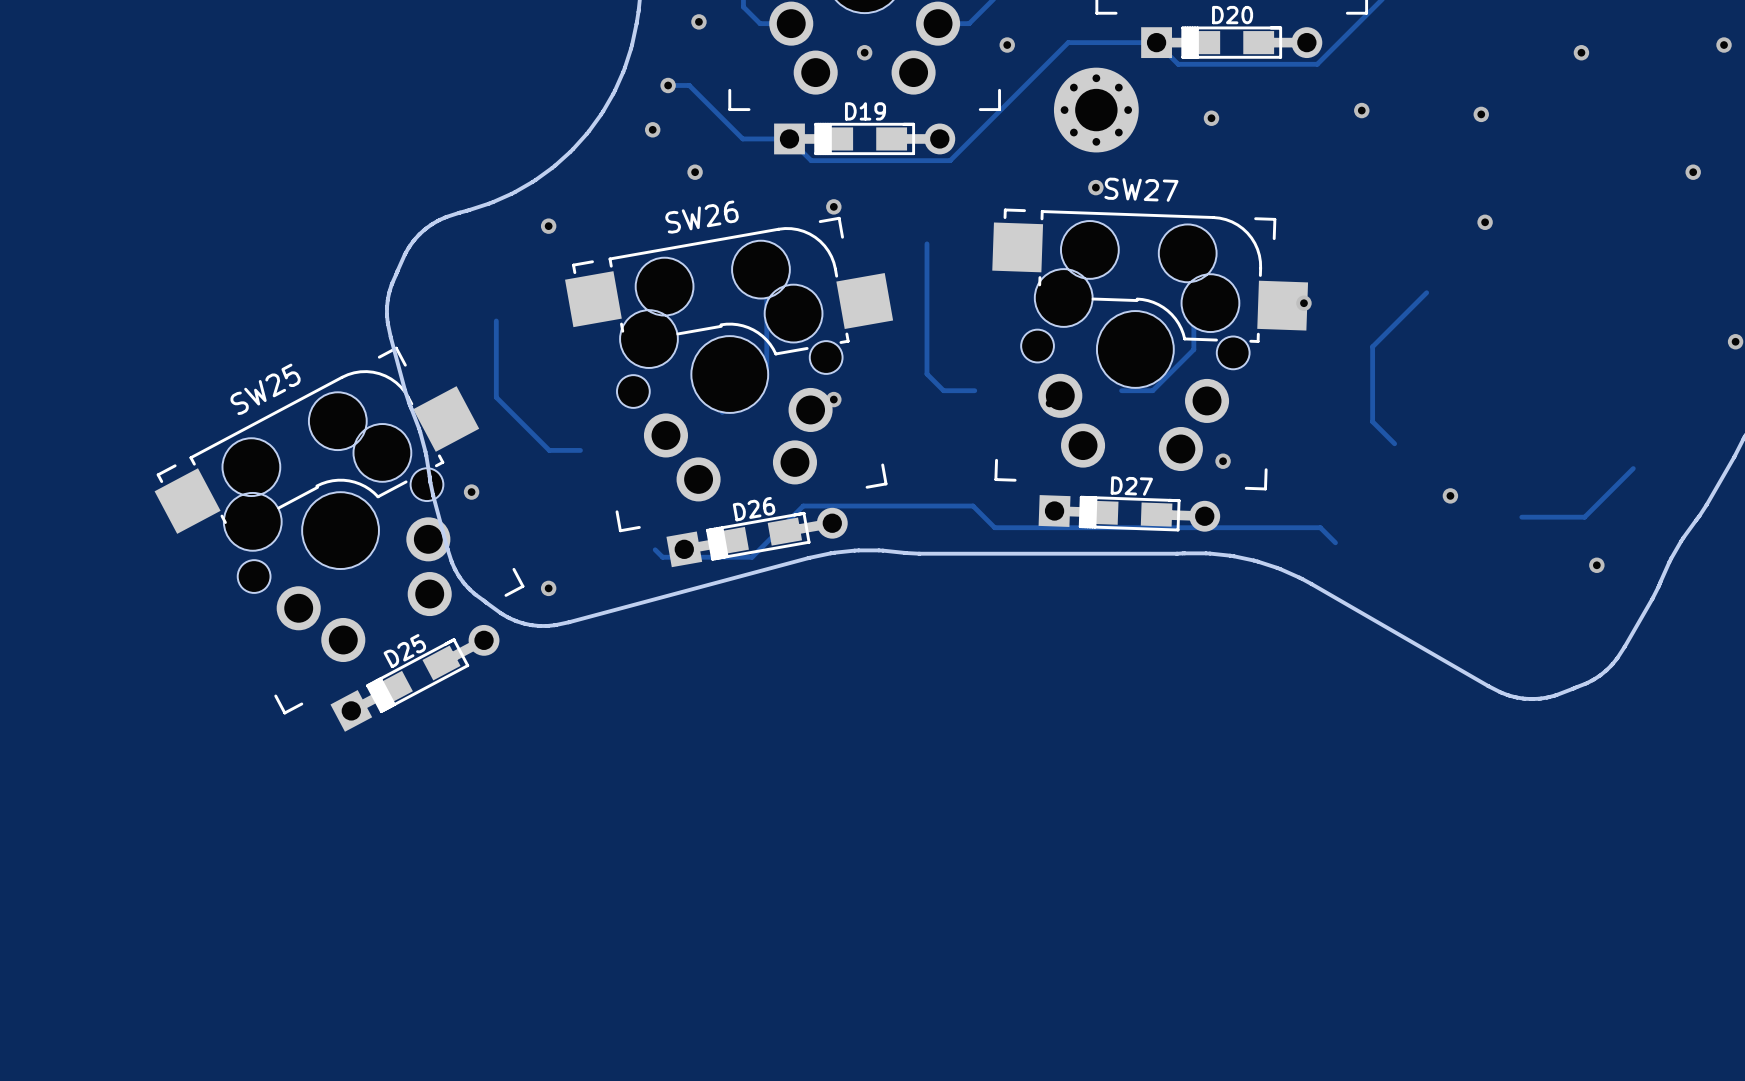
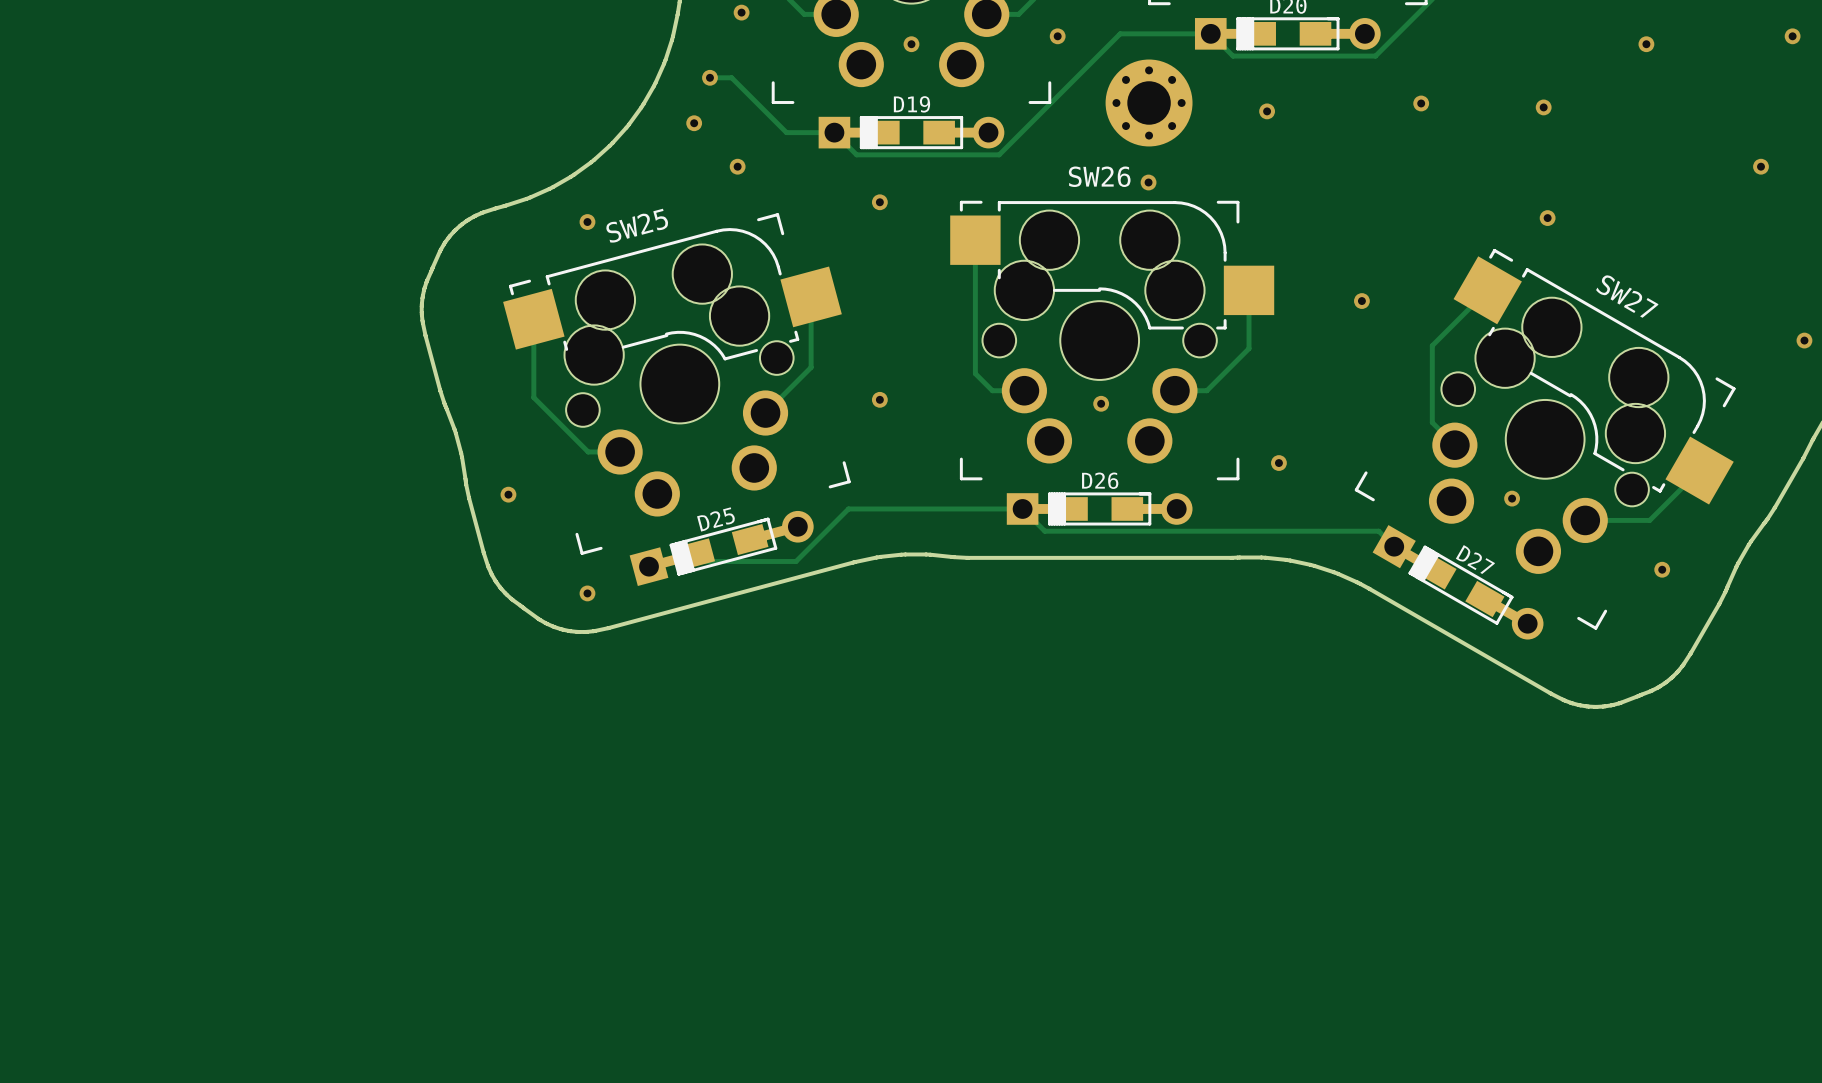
SW27 rotation: 0° (1150, 349) -> 28° clockwise (1545, 439)
SW27 position: (1150, 349) -> (1545, 439)
SW26 rotation: 0° (729, 374) -> 10° clockwise (1112, 340)
SW26 position: (729, 374) -> (1112, 340)
D27 rotation: 0° (1129, 513) -> 28° clockwise (1458, 582)
D27 position: (1129, 513) -> (1458, 582)
SW25 rotation: 0° (339, 530) -> 13° clockwise (676, 384)
SW25 position: (339, 530) -> (676, 384)
D26 rotation: 0° (757, 537) -> 10° clockwise (1099, 508)
D26 position: (757, 537) -> (1099, 508)
D25 rotation: 0° (414, 678) -> 13° clockwise (721, 548)
D25 position: (414, 678) -> (721, 548)

